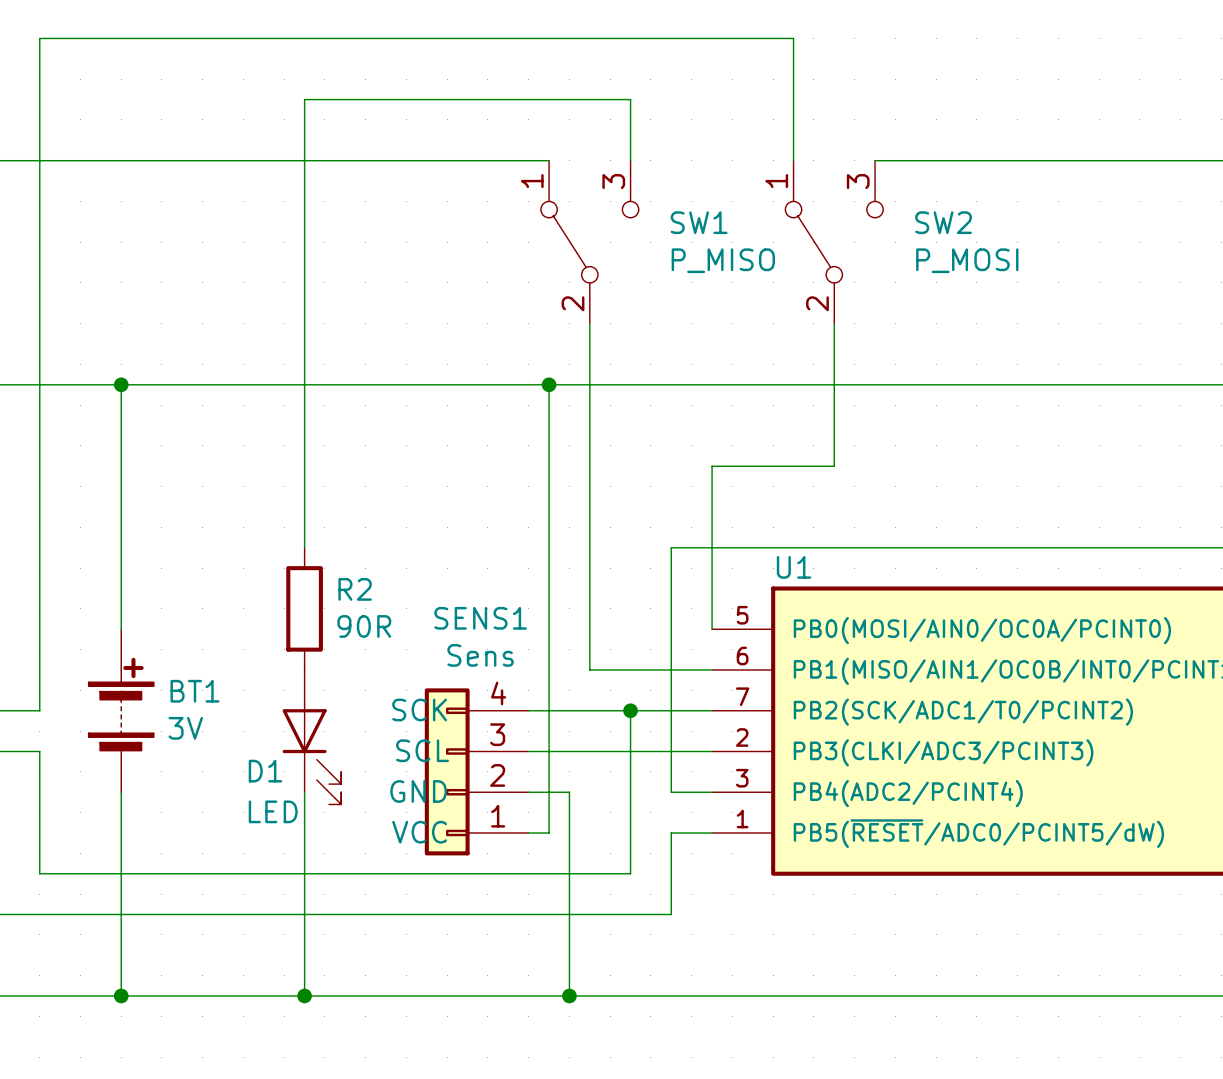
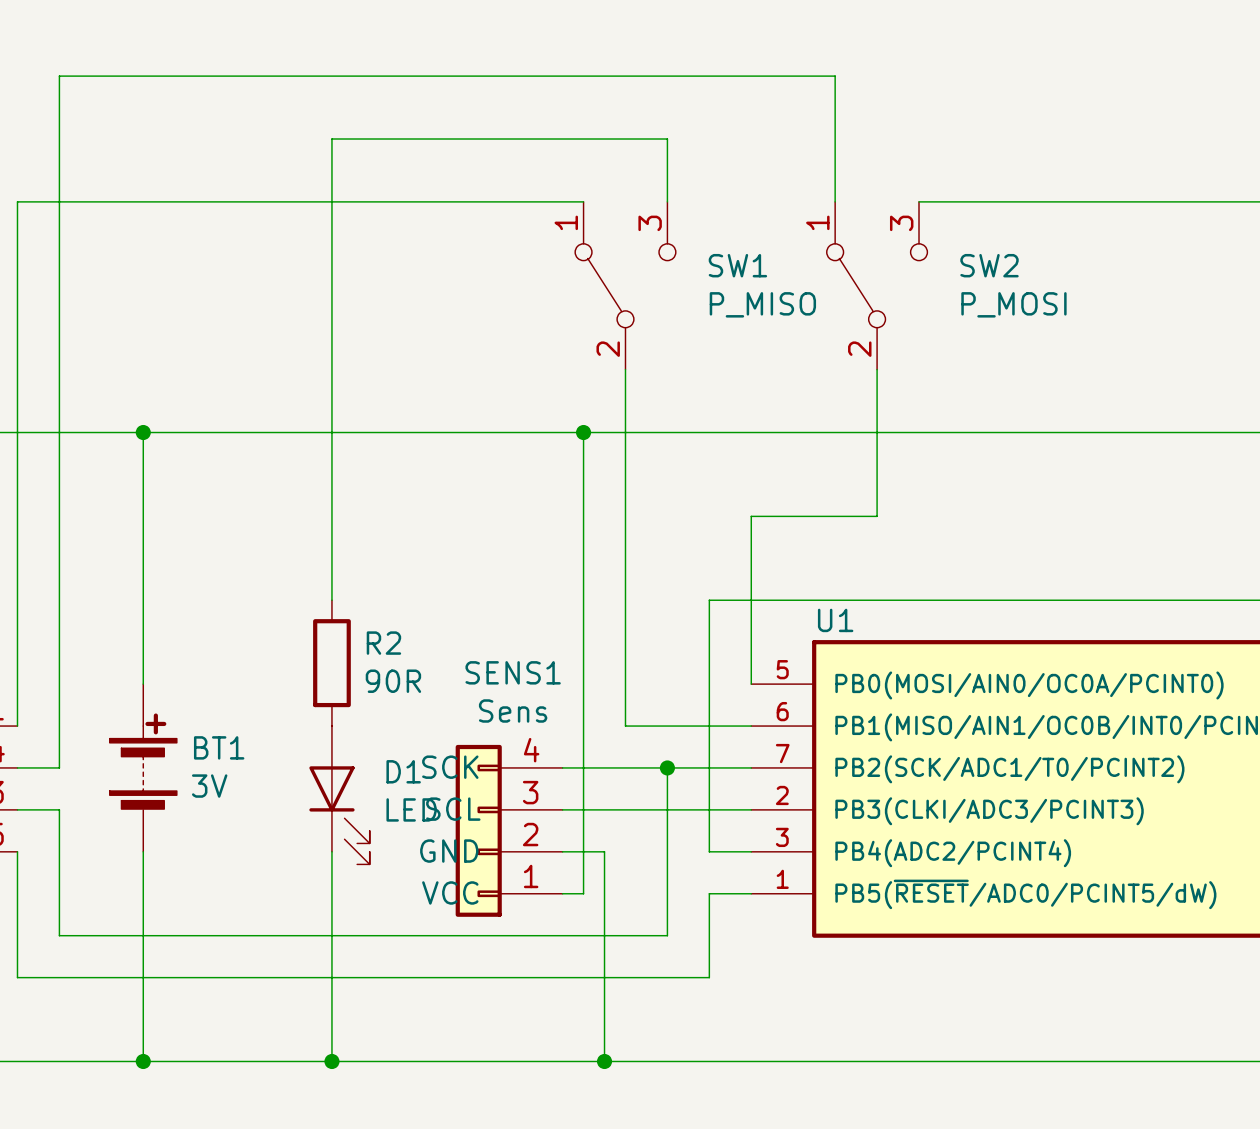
D1 name position: D1 (265, 771) -> D1 (403, 771)
D1 value position: LED (273, 811) -> LED (411, 809)

